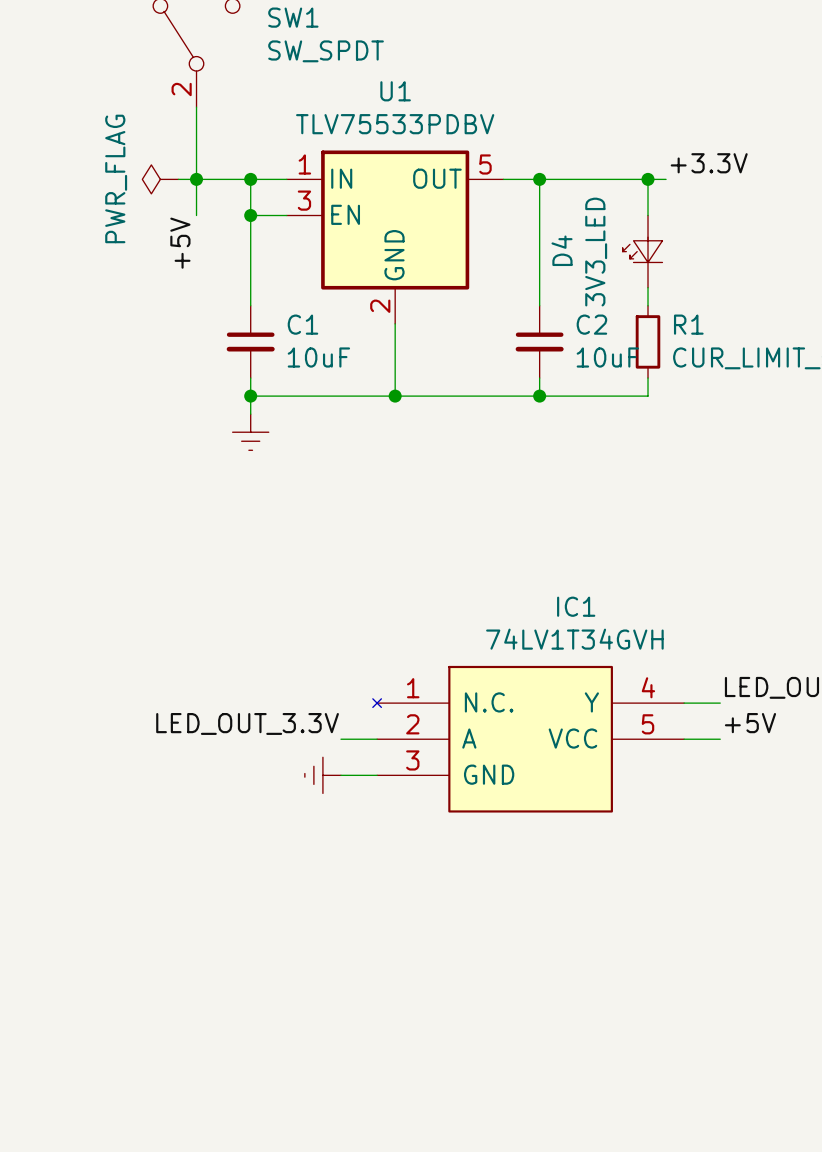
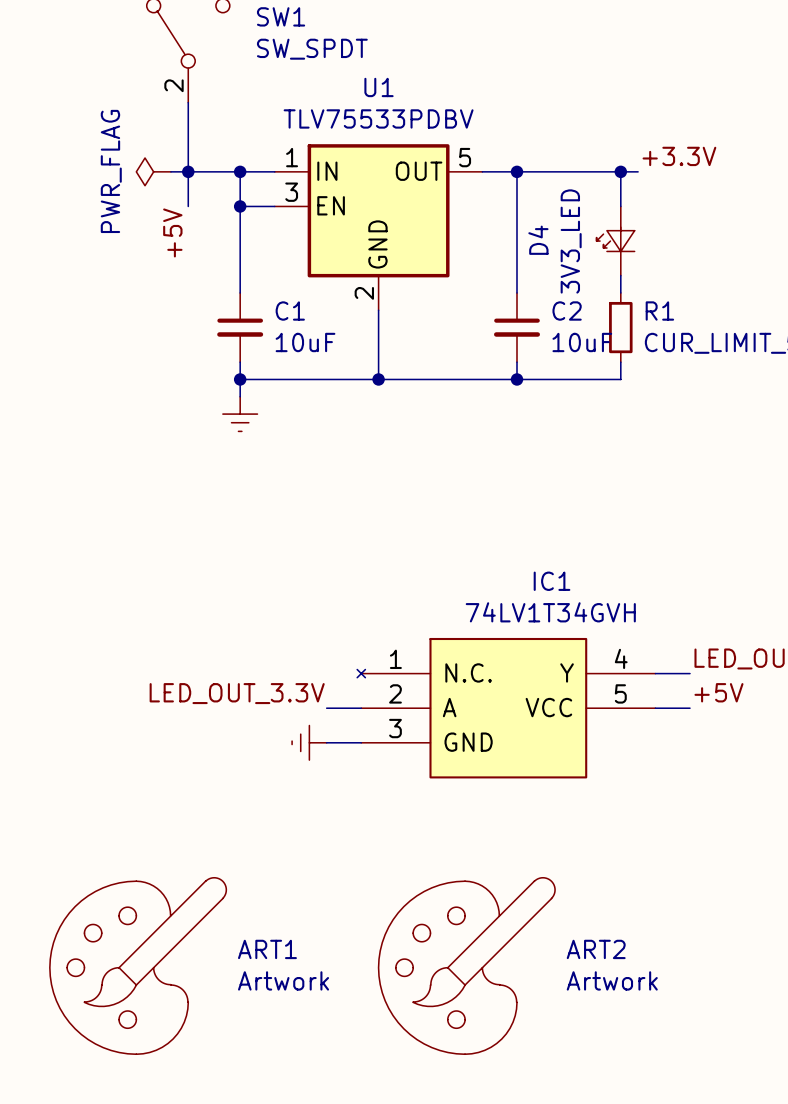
ART1: none -> Artwork (138, 965)
ART2: none -> Artwork (466, 965)

